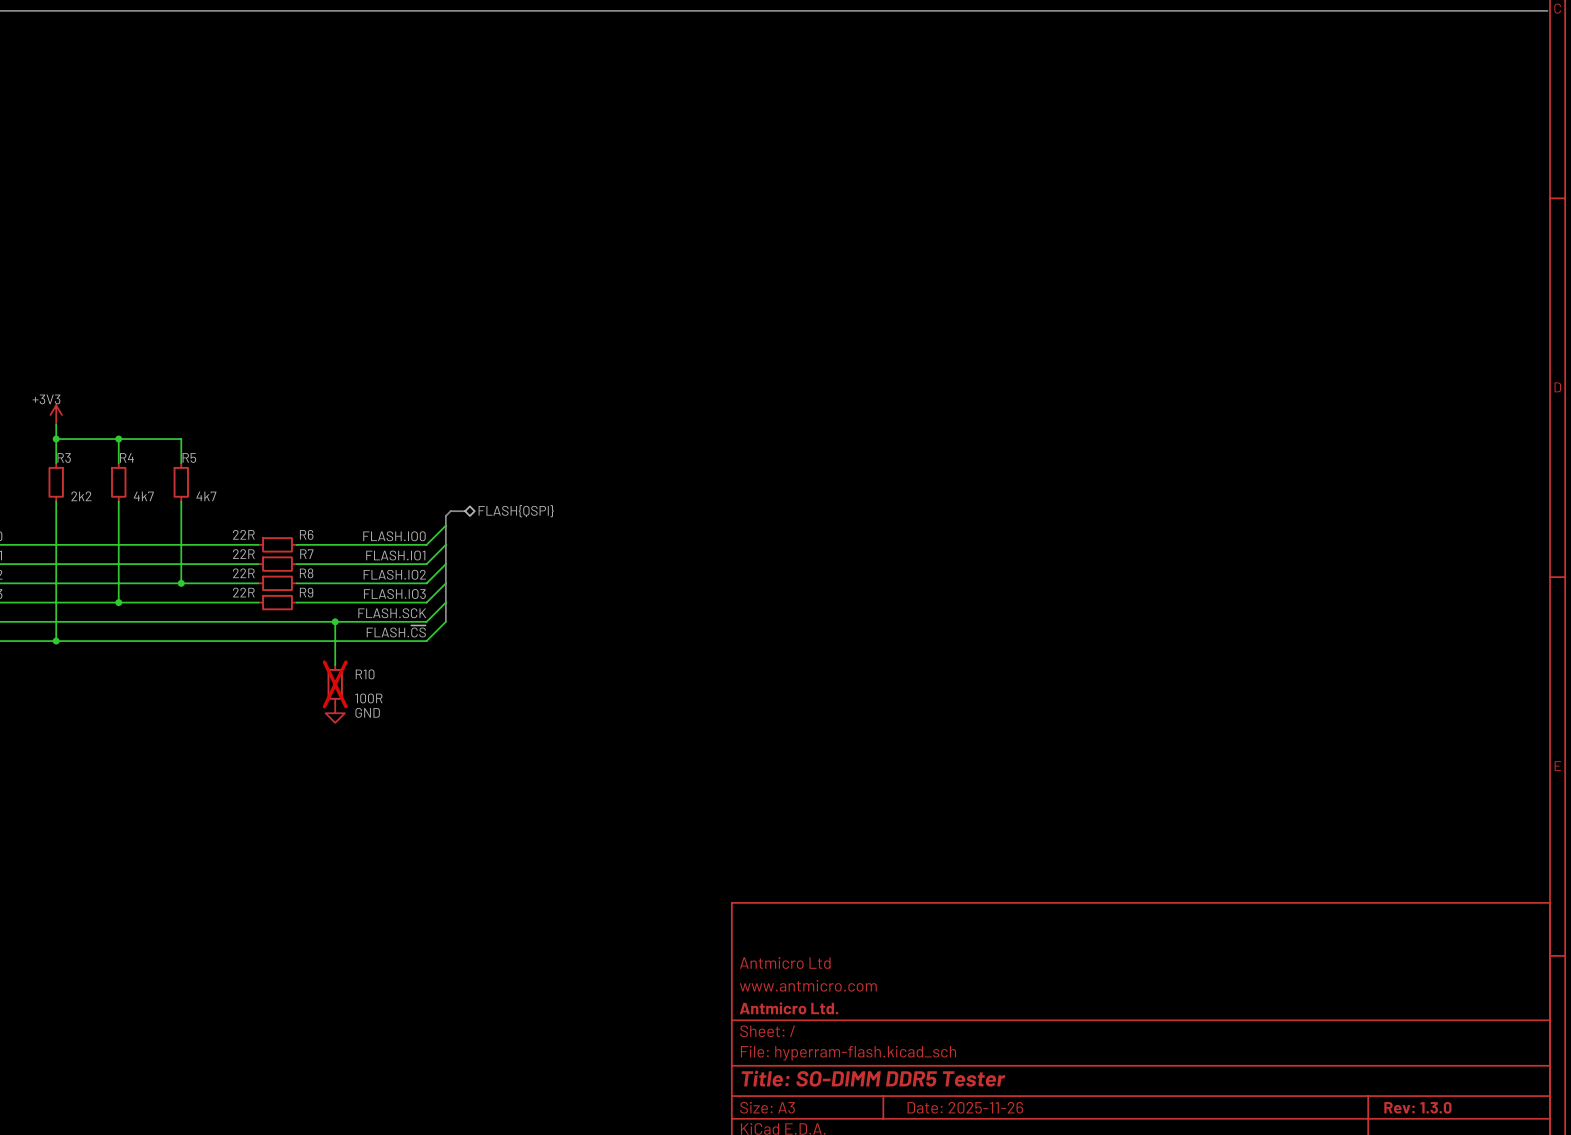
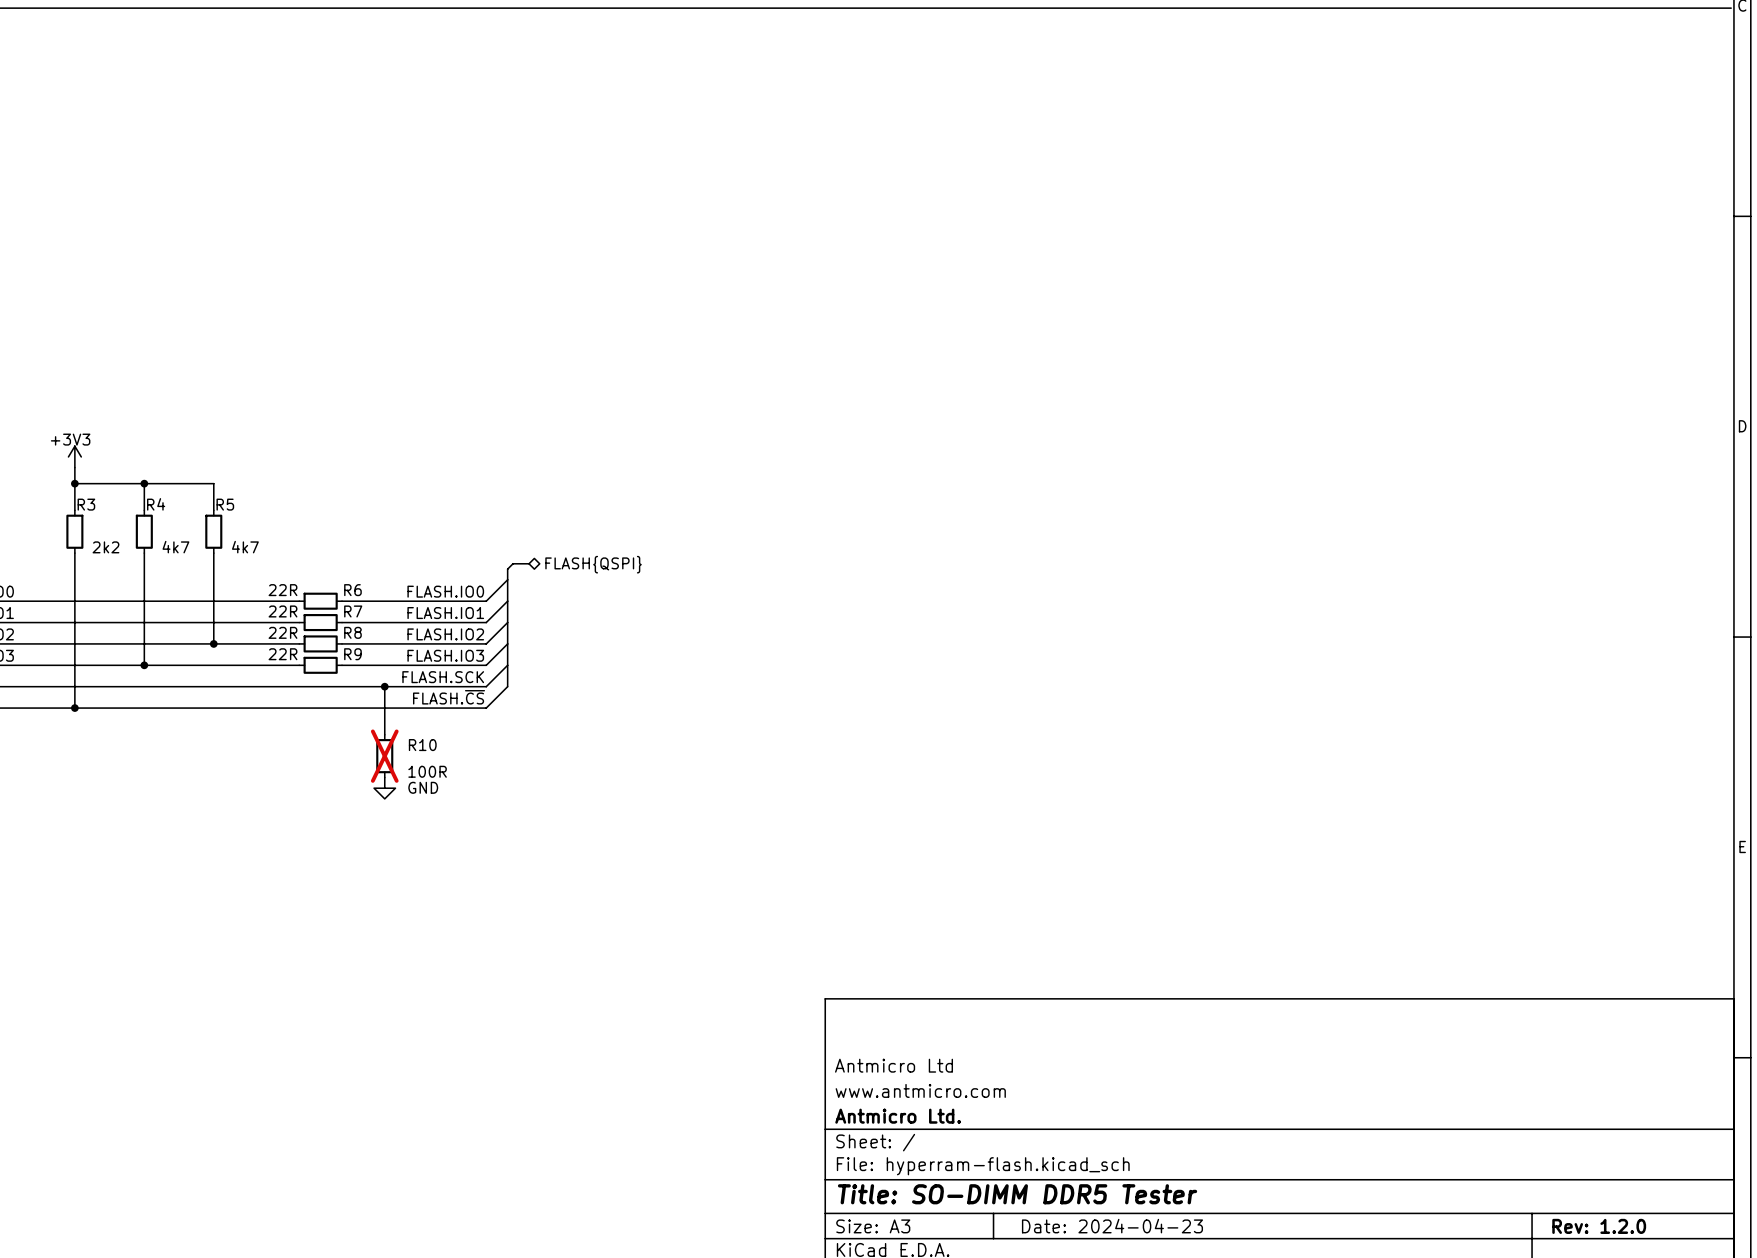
title block: Date: 2025-11-26 (965, 1107) -> Date: 2024-04-23 (1112, 1226)
title block: Rev: 1.3.0 (1417, 1107) -> Rev: 1.2.0 (1599, 1226)

